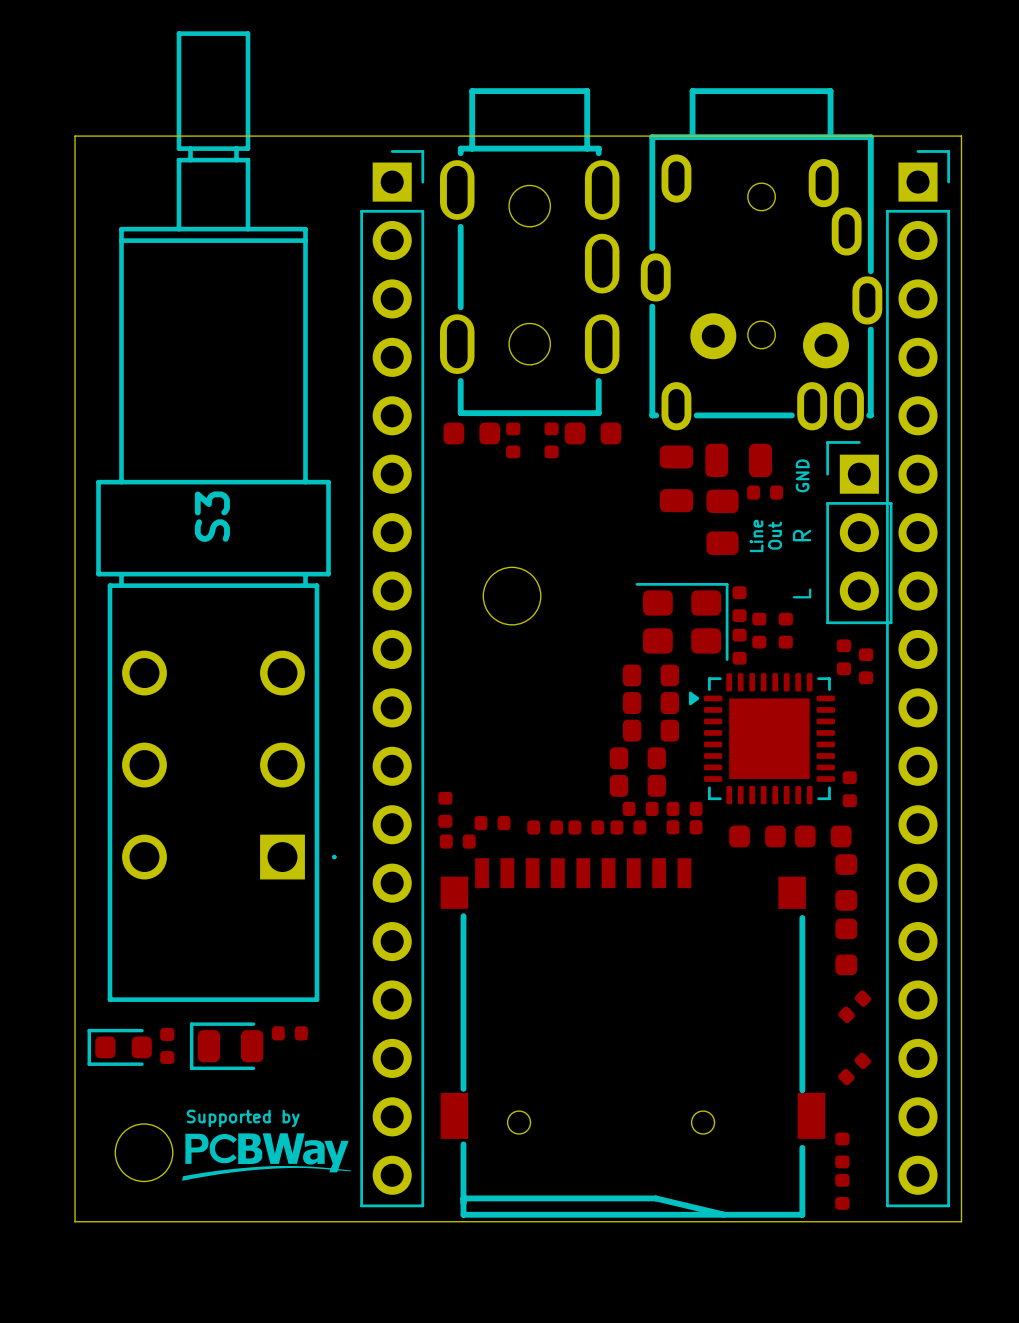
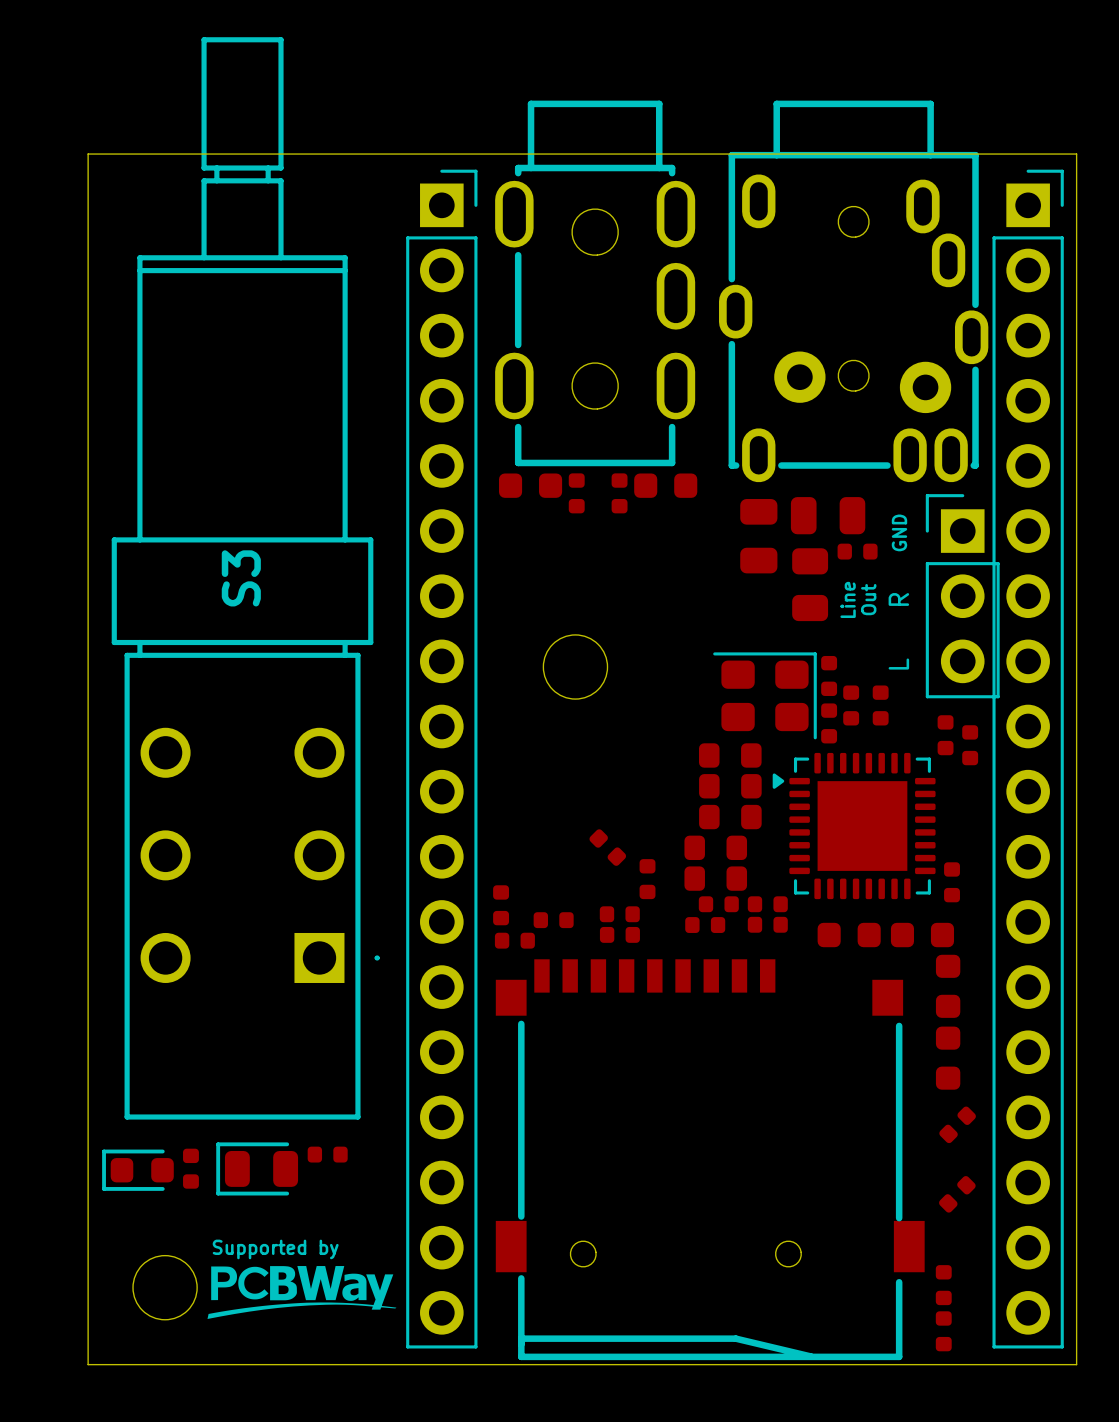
part: none -> (607, 847)
part: none -> (647, 879)
part: none -> (619, 914)
part: (545, 827) -> none
part: (586, 827) -> none
part: none -> (619, 934)

